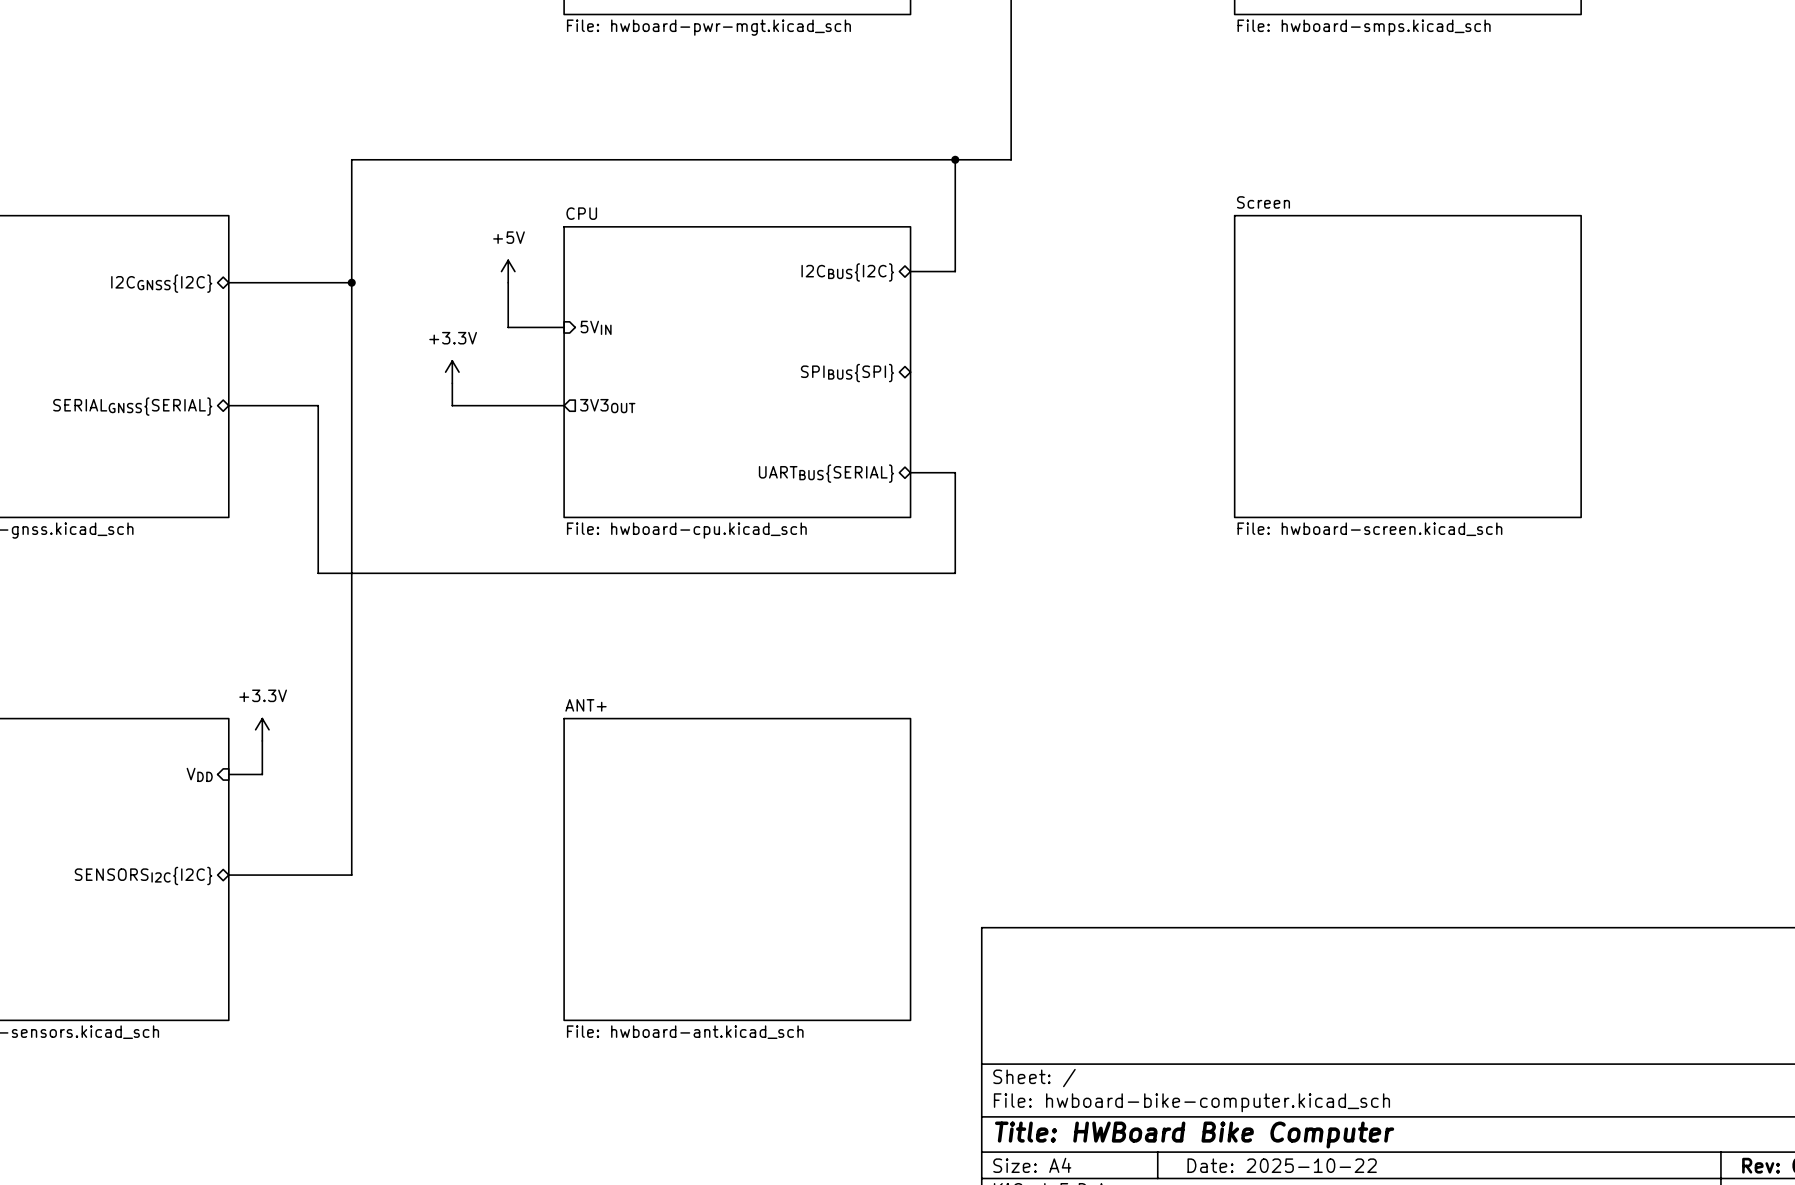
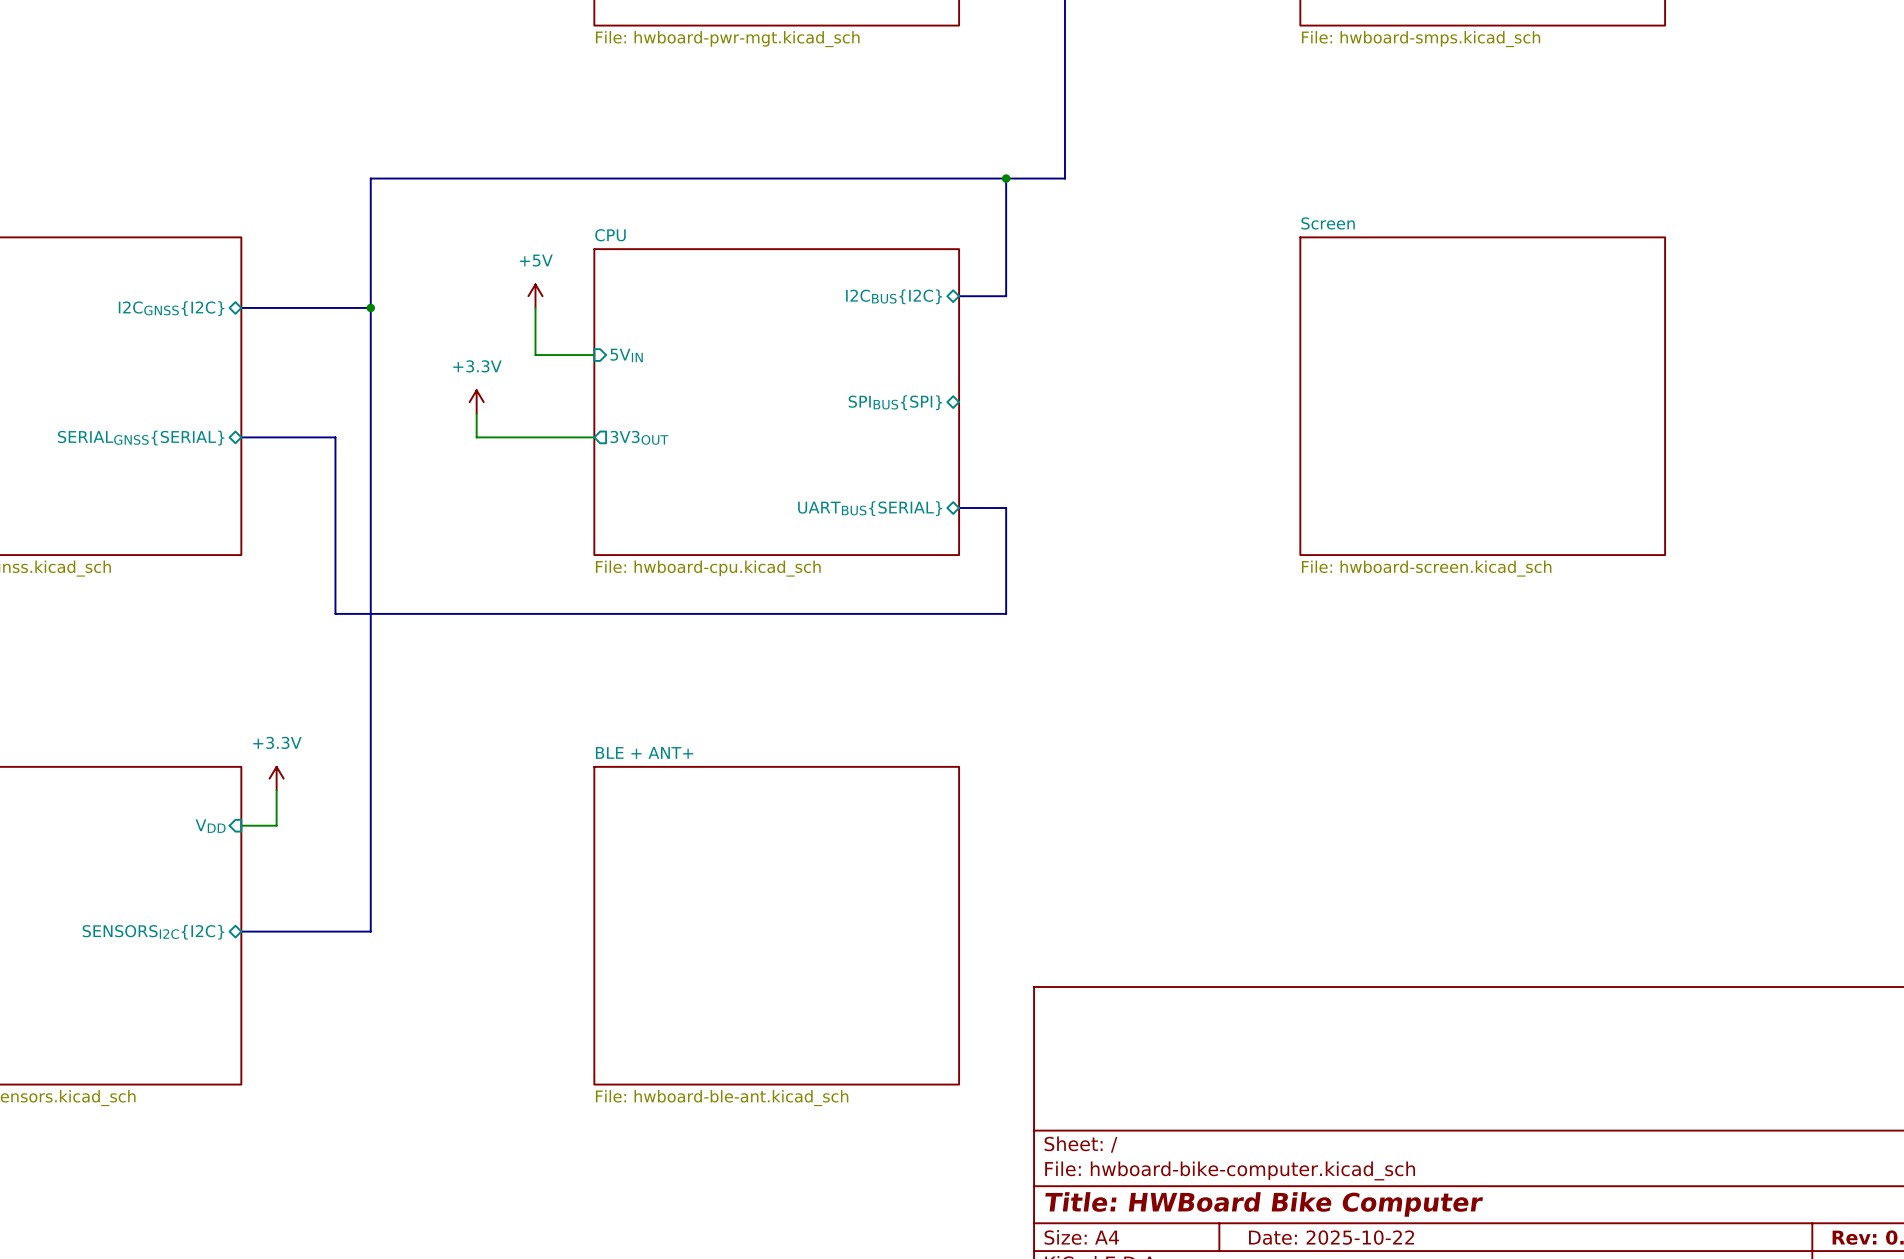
sheet ANT+ name: ANT+ (585, 705) -> BLE + ANT+ (644, 752)
sheet ANT+ value: File: hwboard-ant.kicad_sch (685, 1032) -> File: hwboard-ble-ant.kicad_sch (722, 1098)

